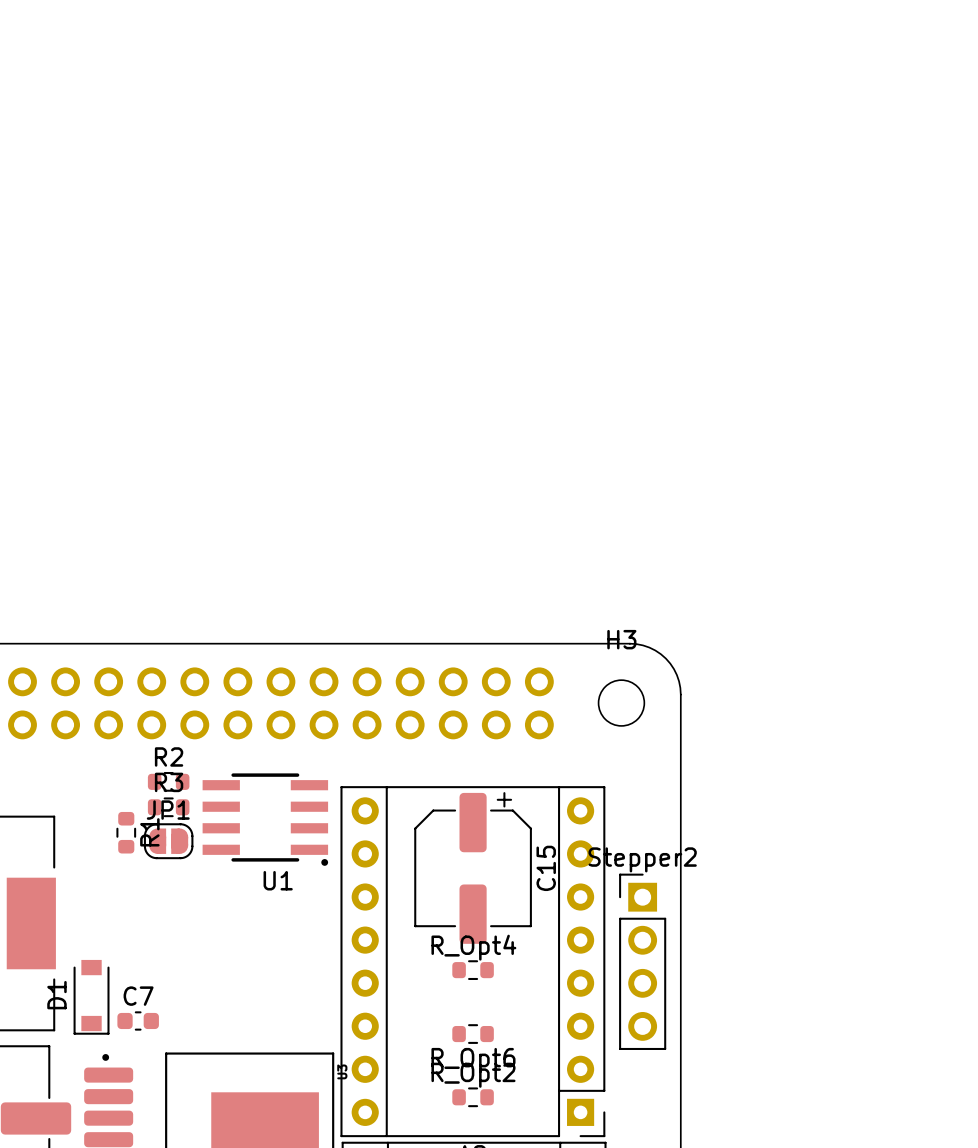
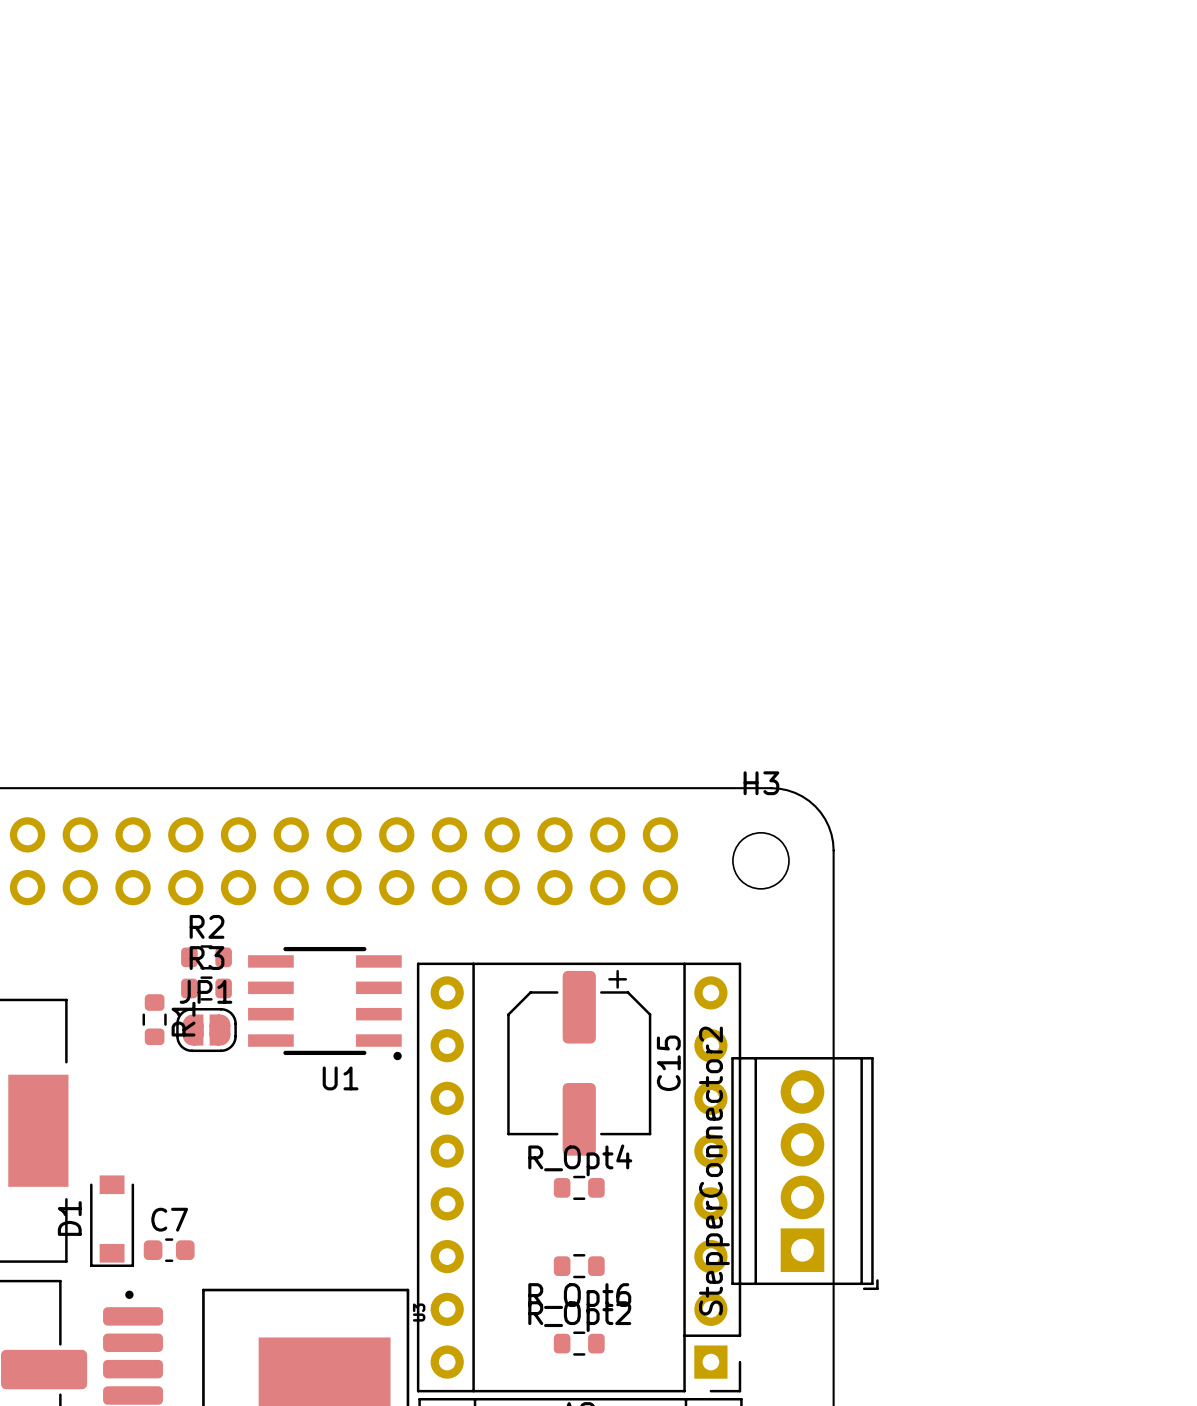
StepperConnector2: none -> (804, 1173)
Stepper2: (642, 961) -> none

